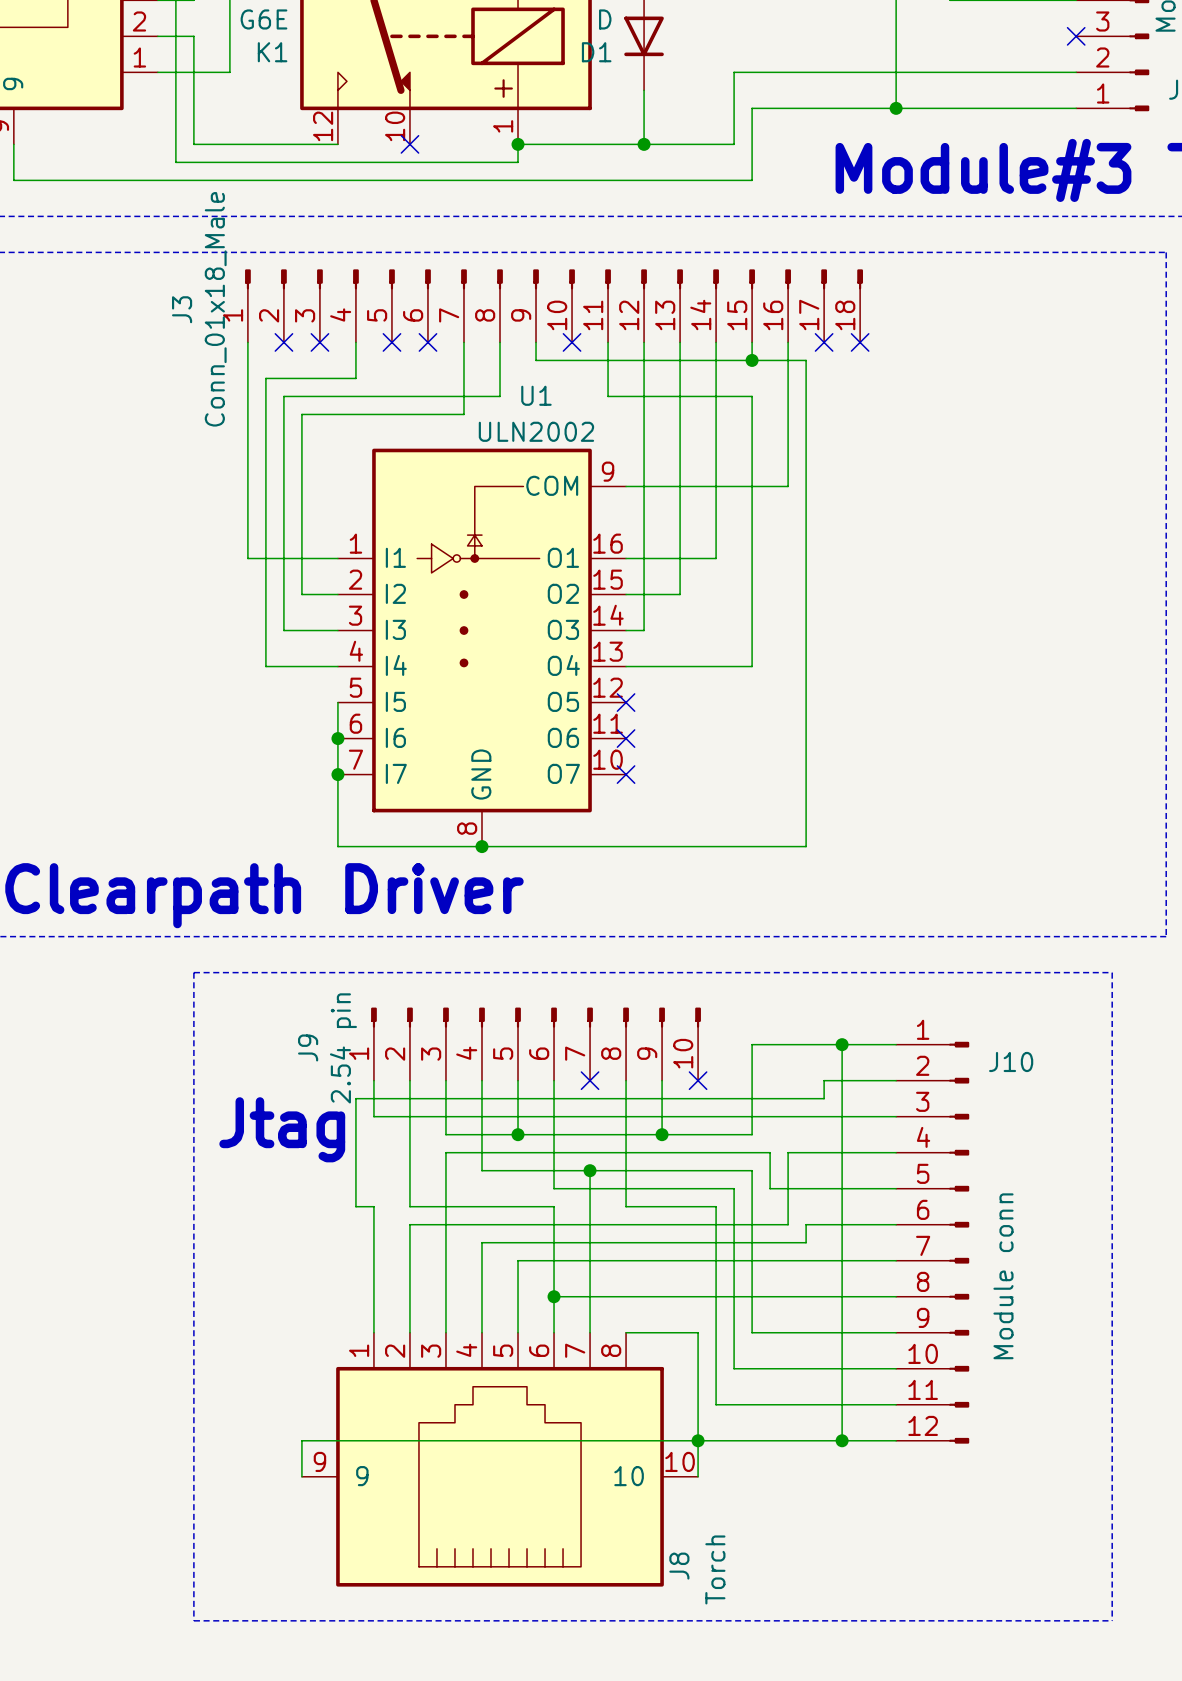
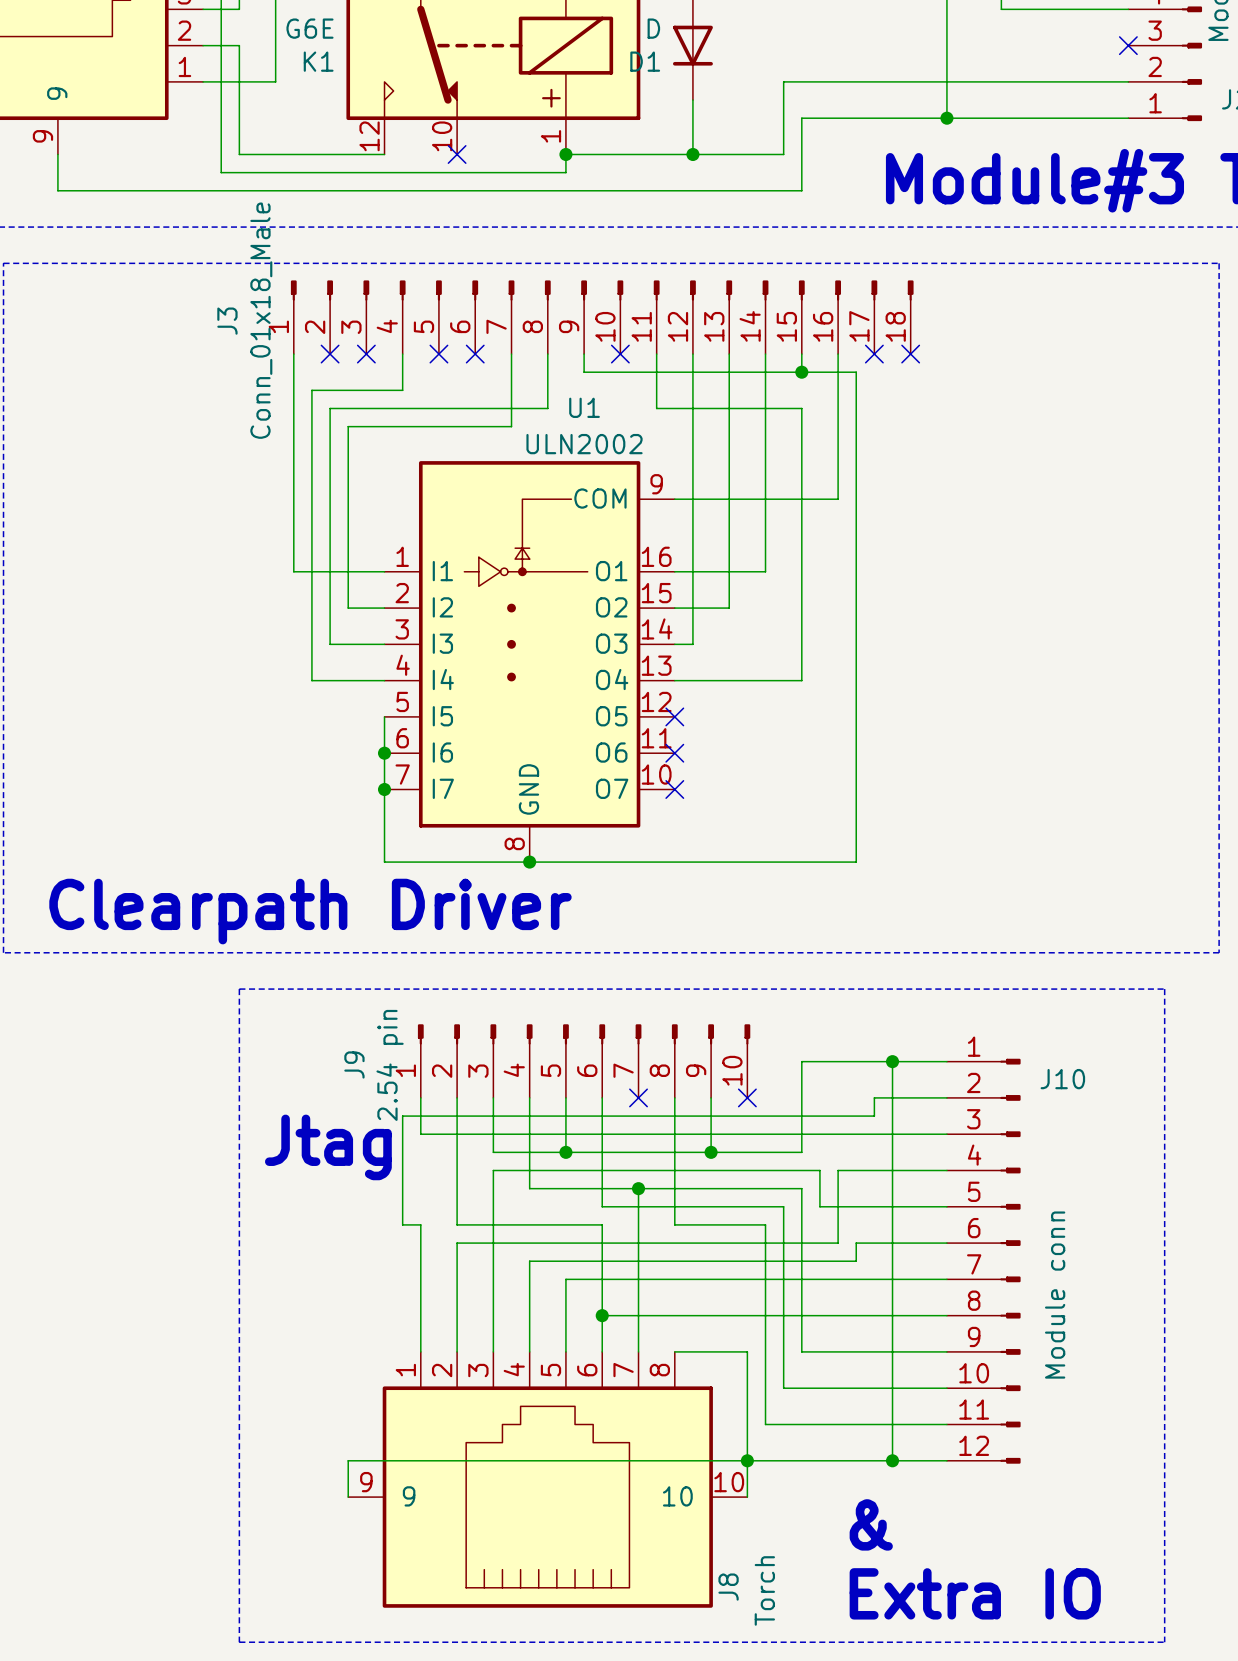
text: none -> & (871, 1524)
text: none -> Extra IO (975, 1593)

